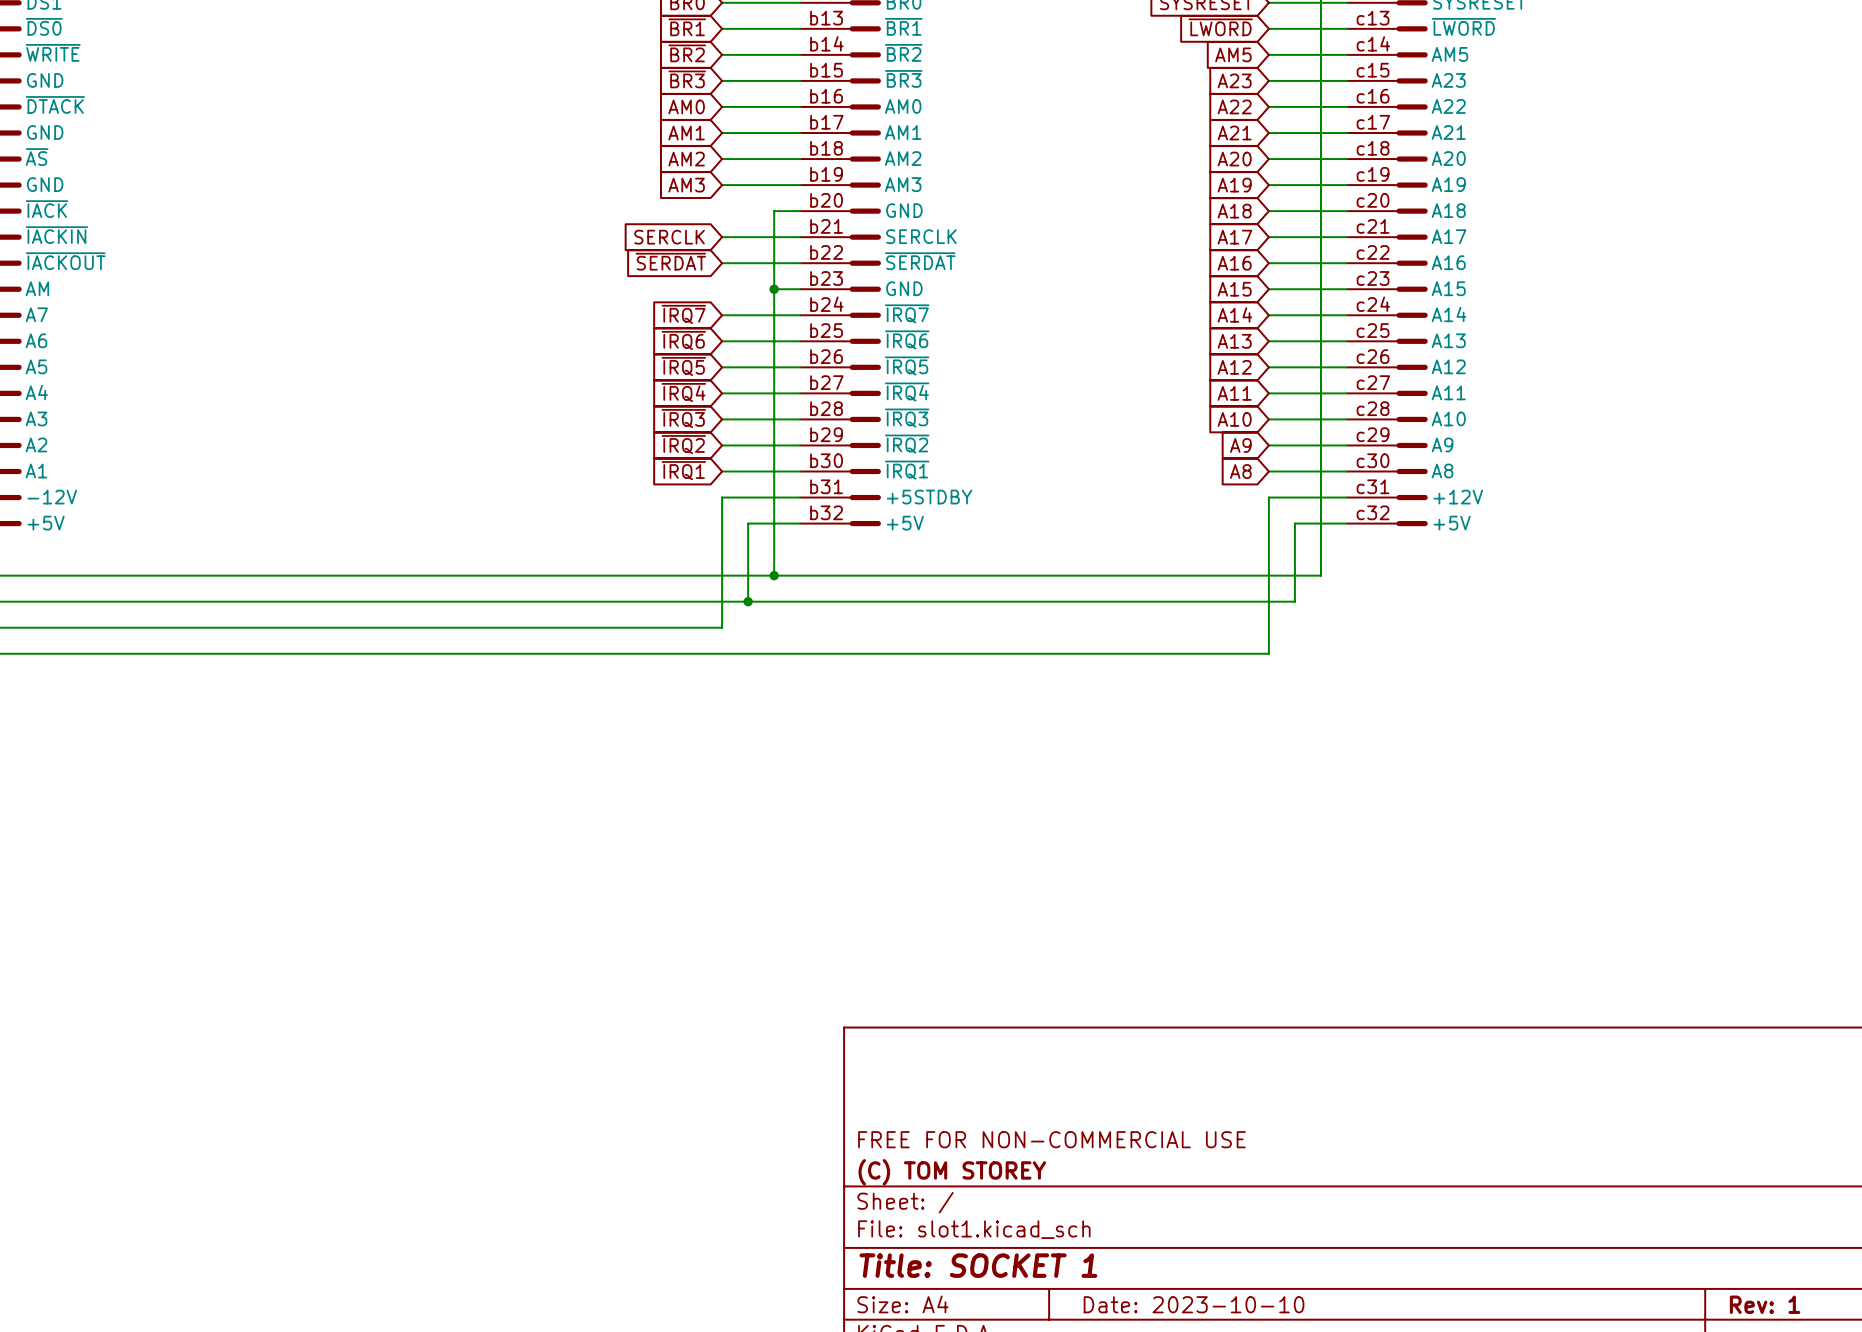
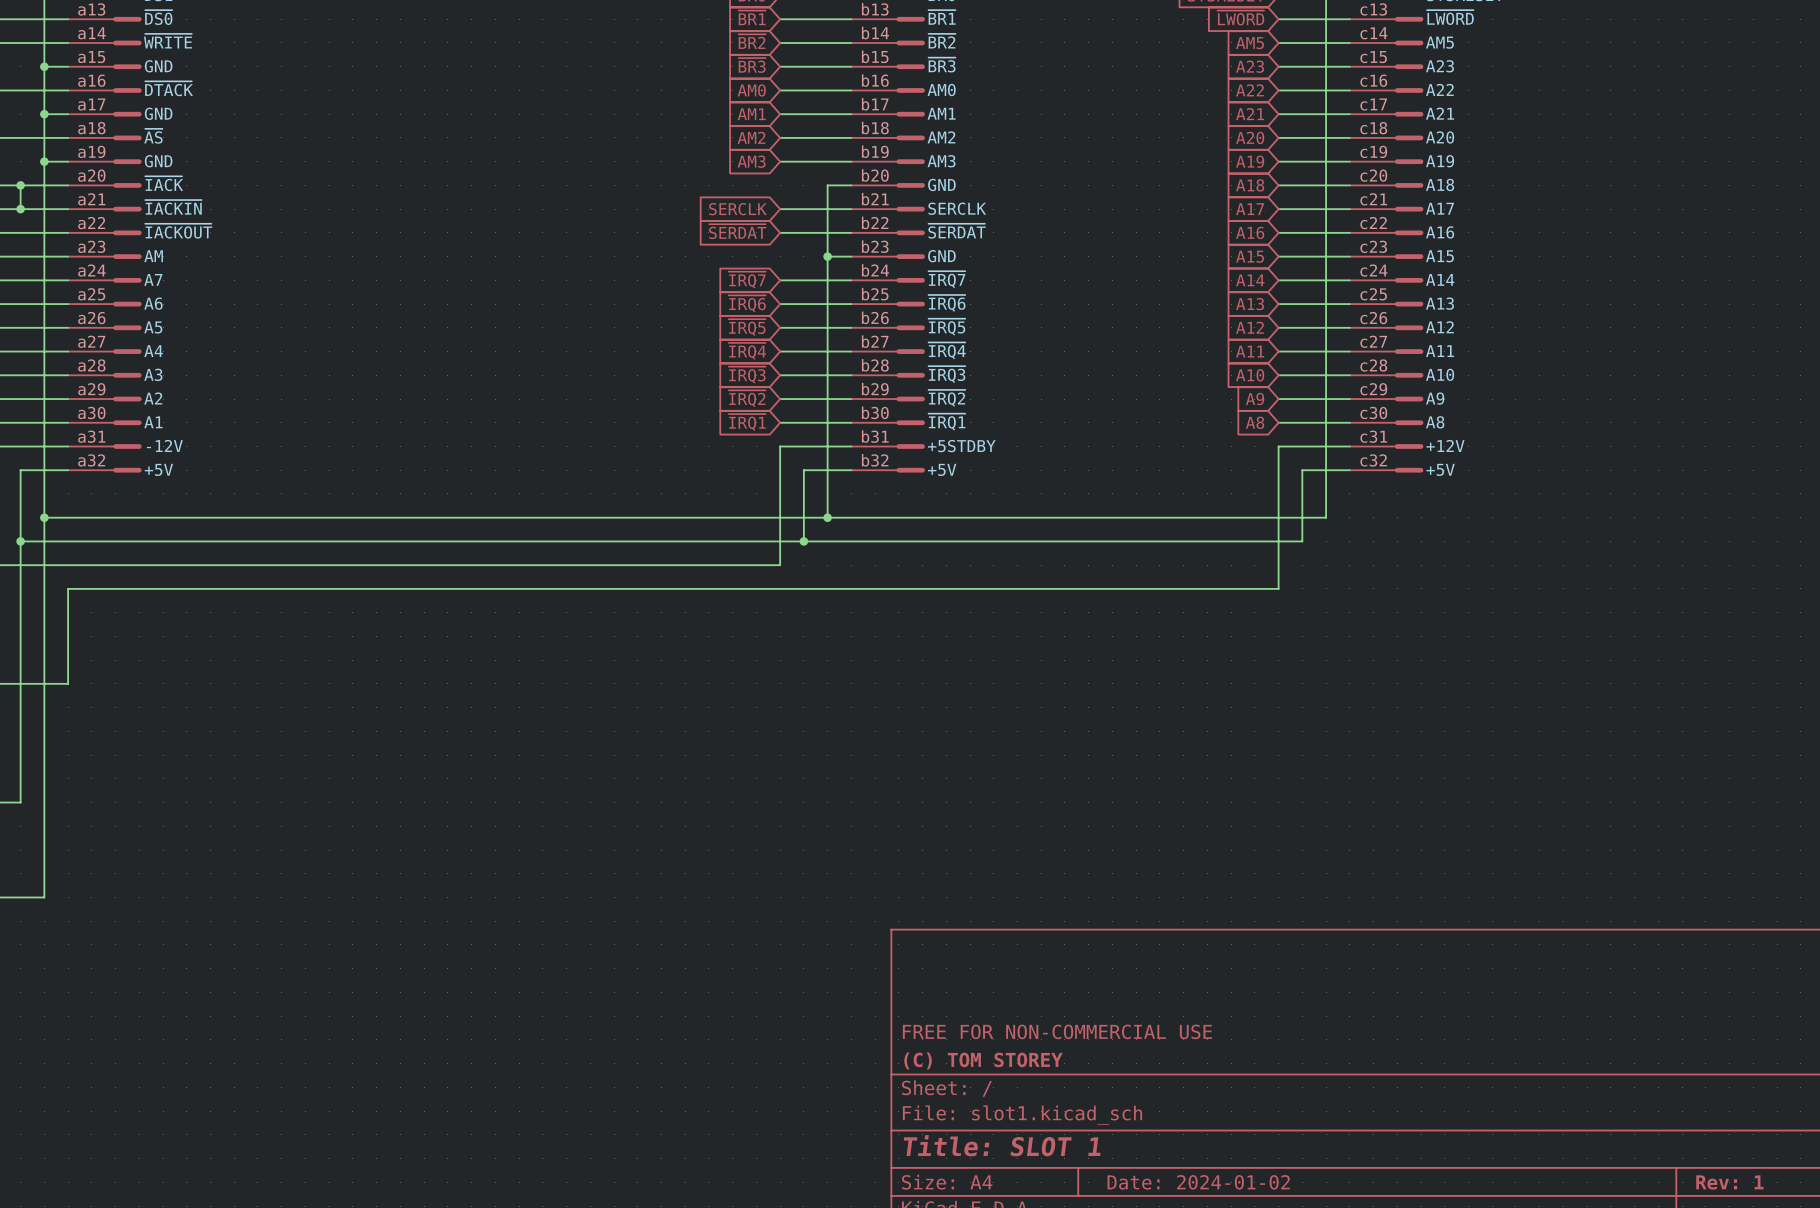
title block: Title: SOCKET 1 (978, 1265) -> Title: SLOT 1 (1002, 1145)
title block: Date: 2023-10-10 (1194, 1304) -> Date: 2024-01-02 (1198, 1182)

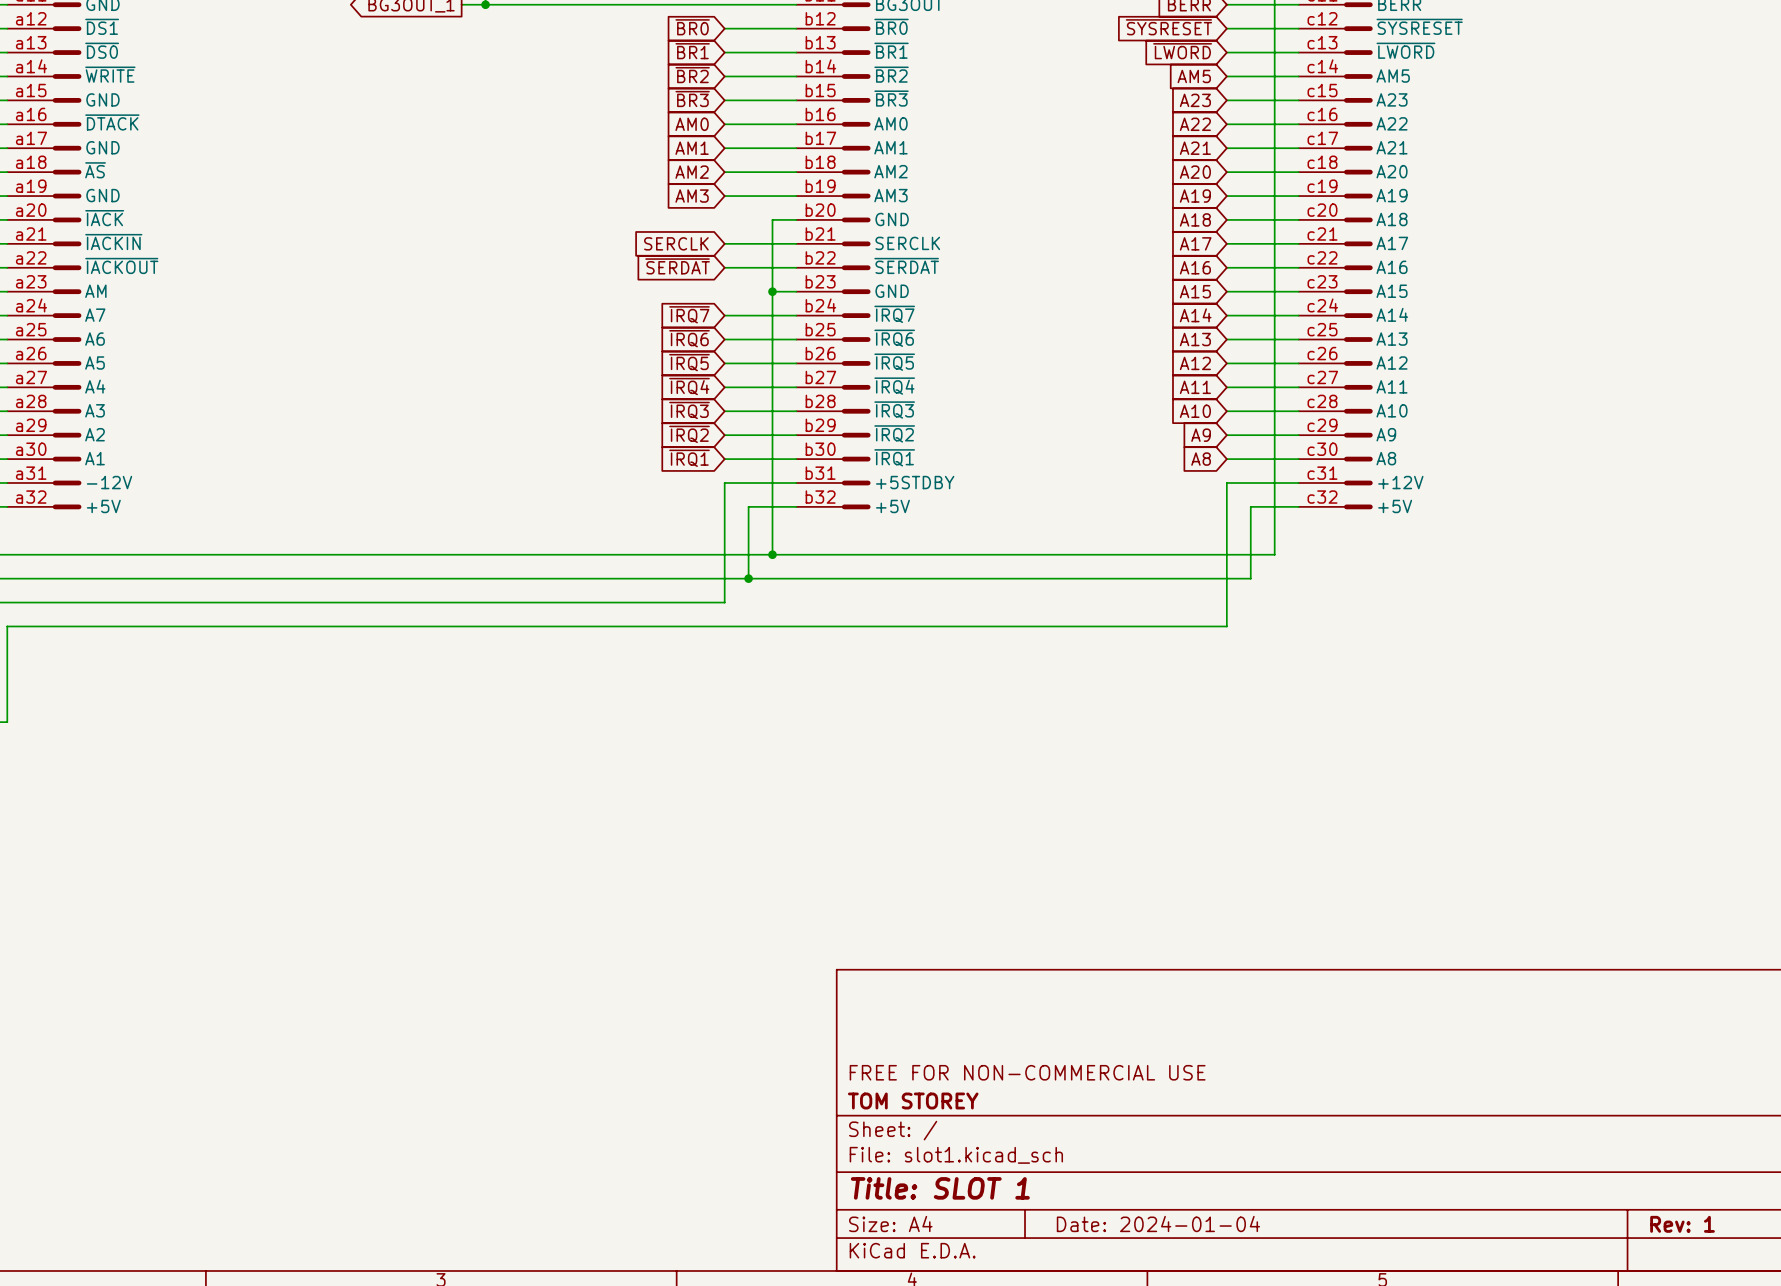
title block: (C) TOM STOREY (983, 1060) -> TOM STOREY (913, 1101)
title block: Date: 2024-01-02 (1198, 1182) -> Date: 2024-01-04 (1158, 1224)

